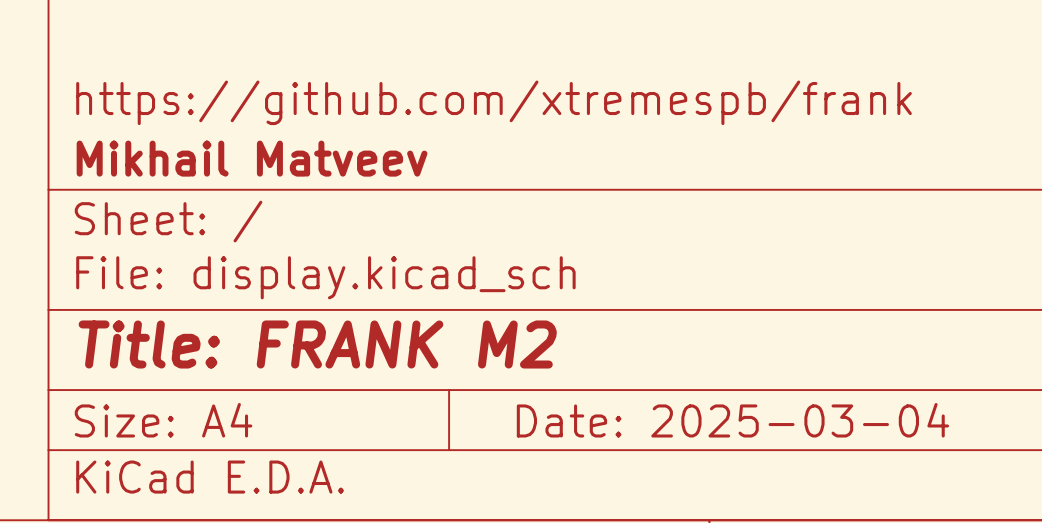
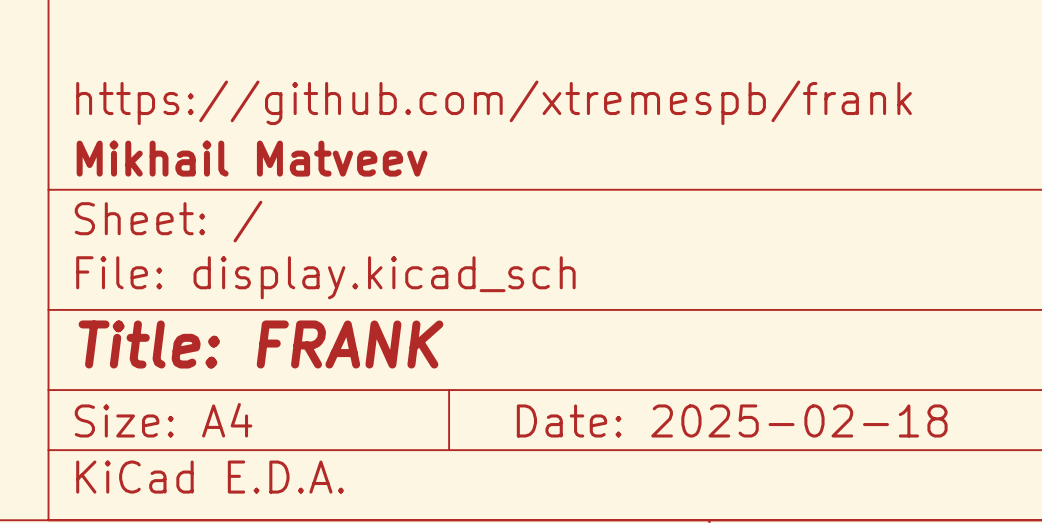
title block: Title: FRANK M2 (317, 344) -> Title: FRANK (260, 344)
title block: Date: 2025-03-04 (732, 420) -> Date: 2025-02-18 (732, 420)

